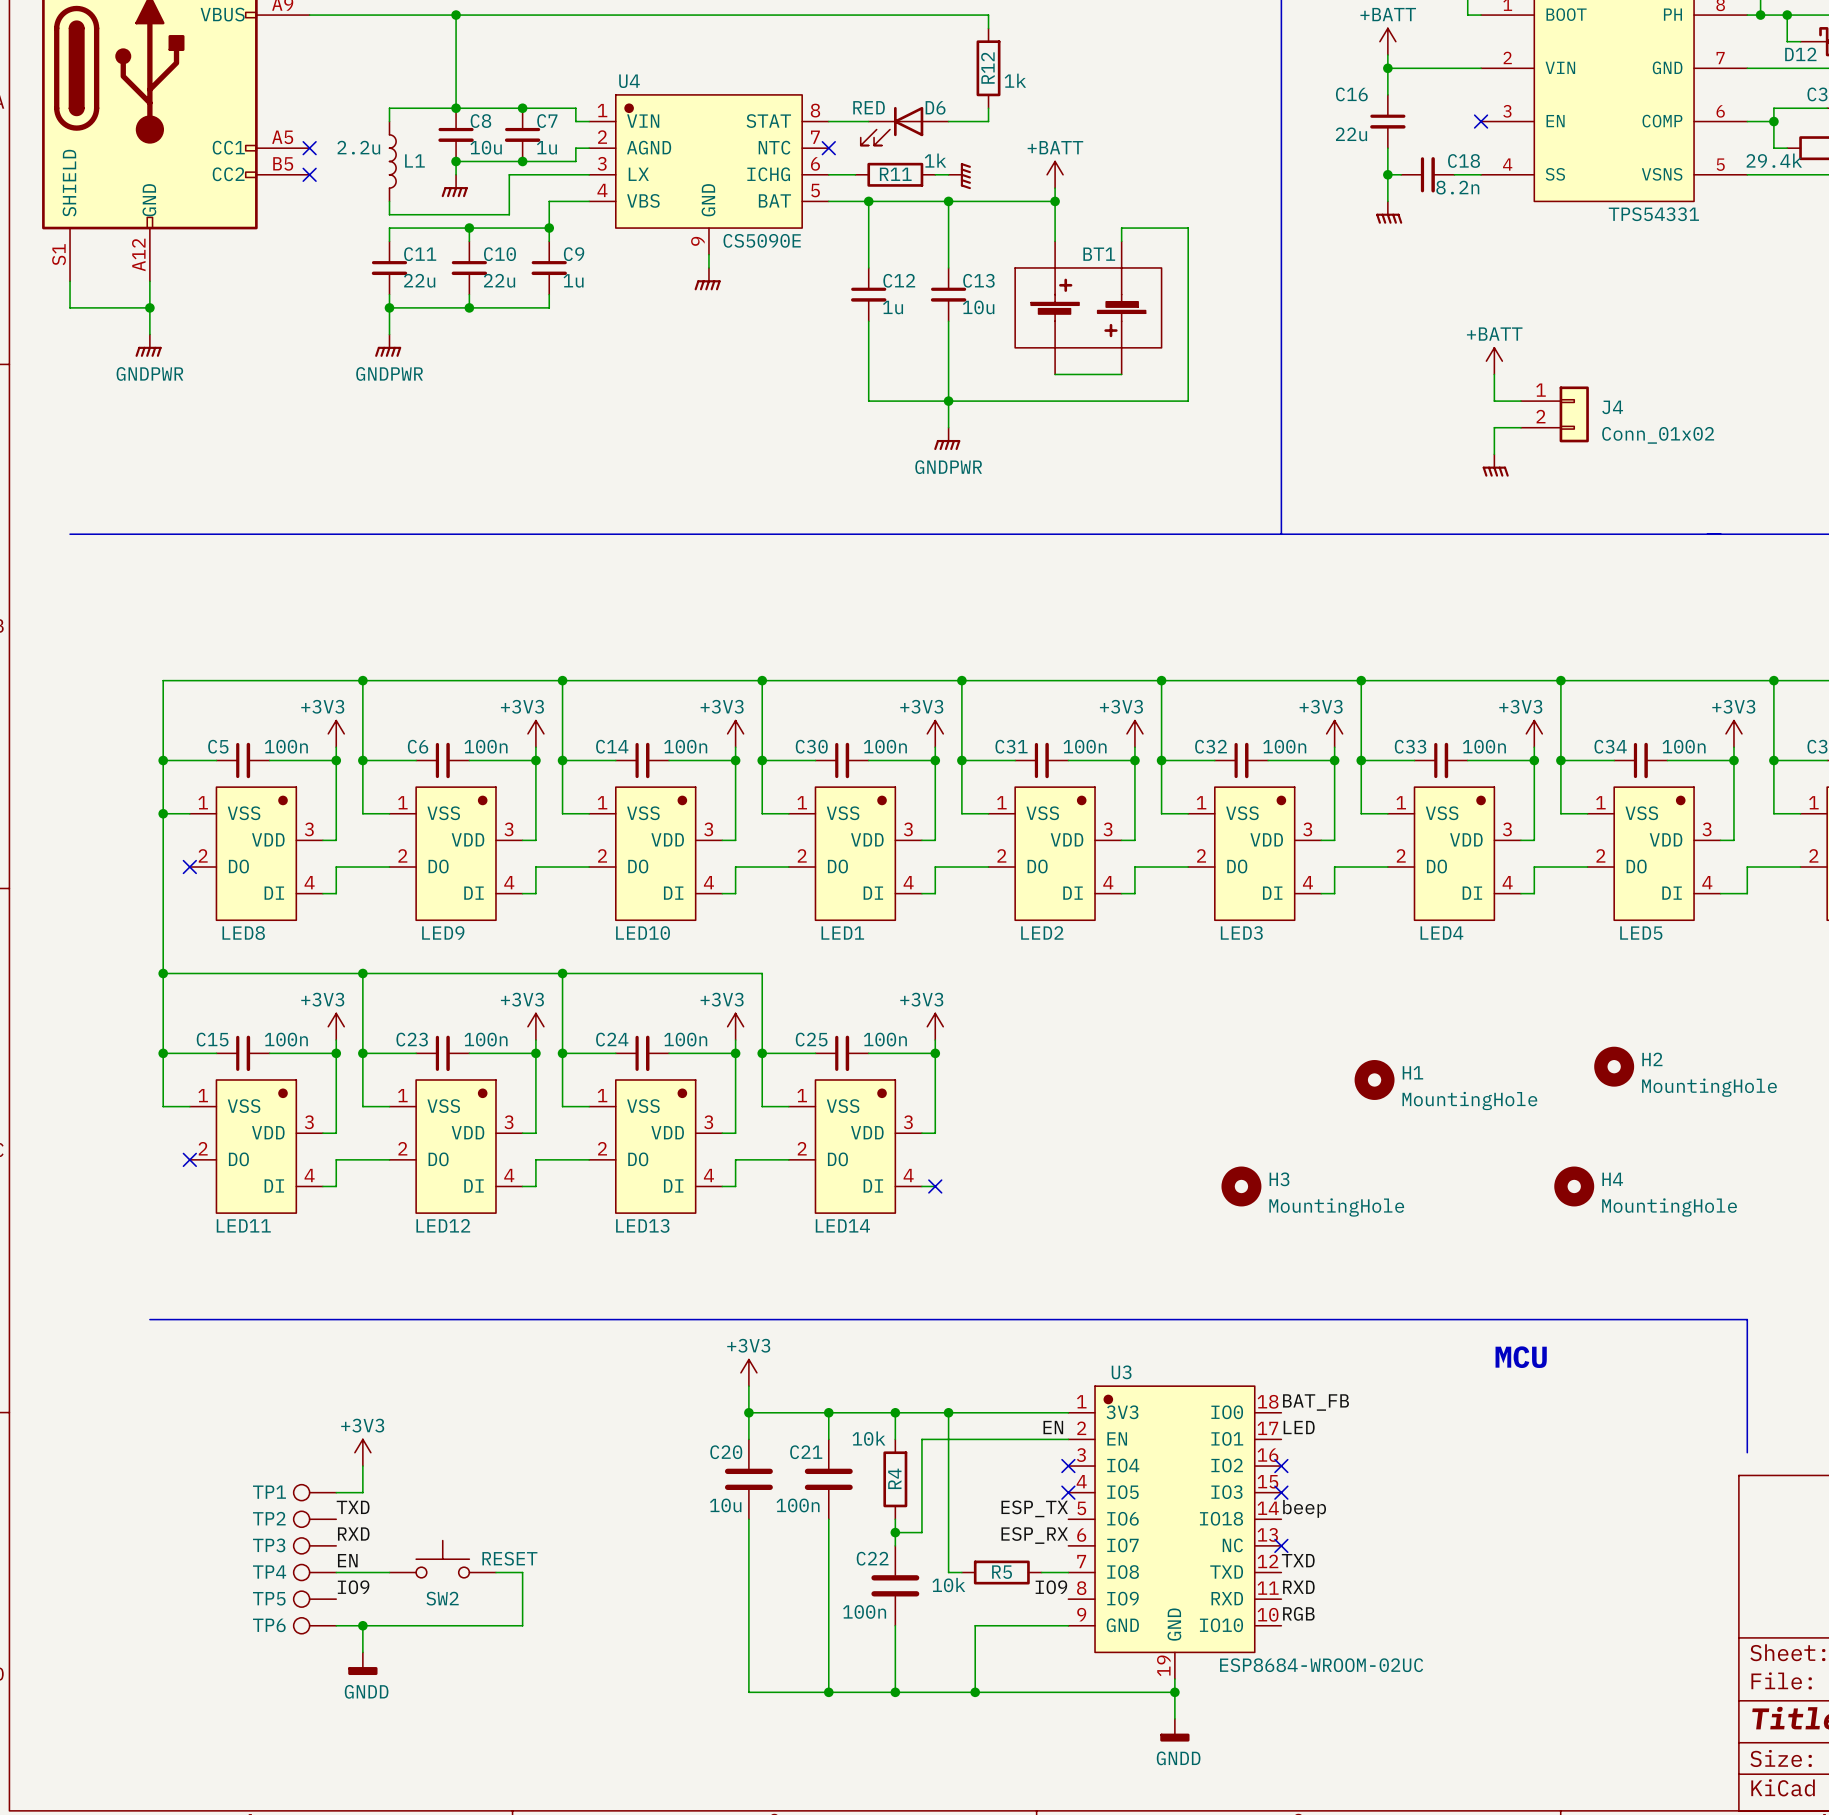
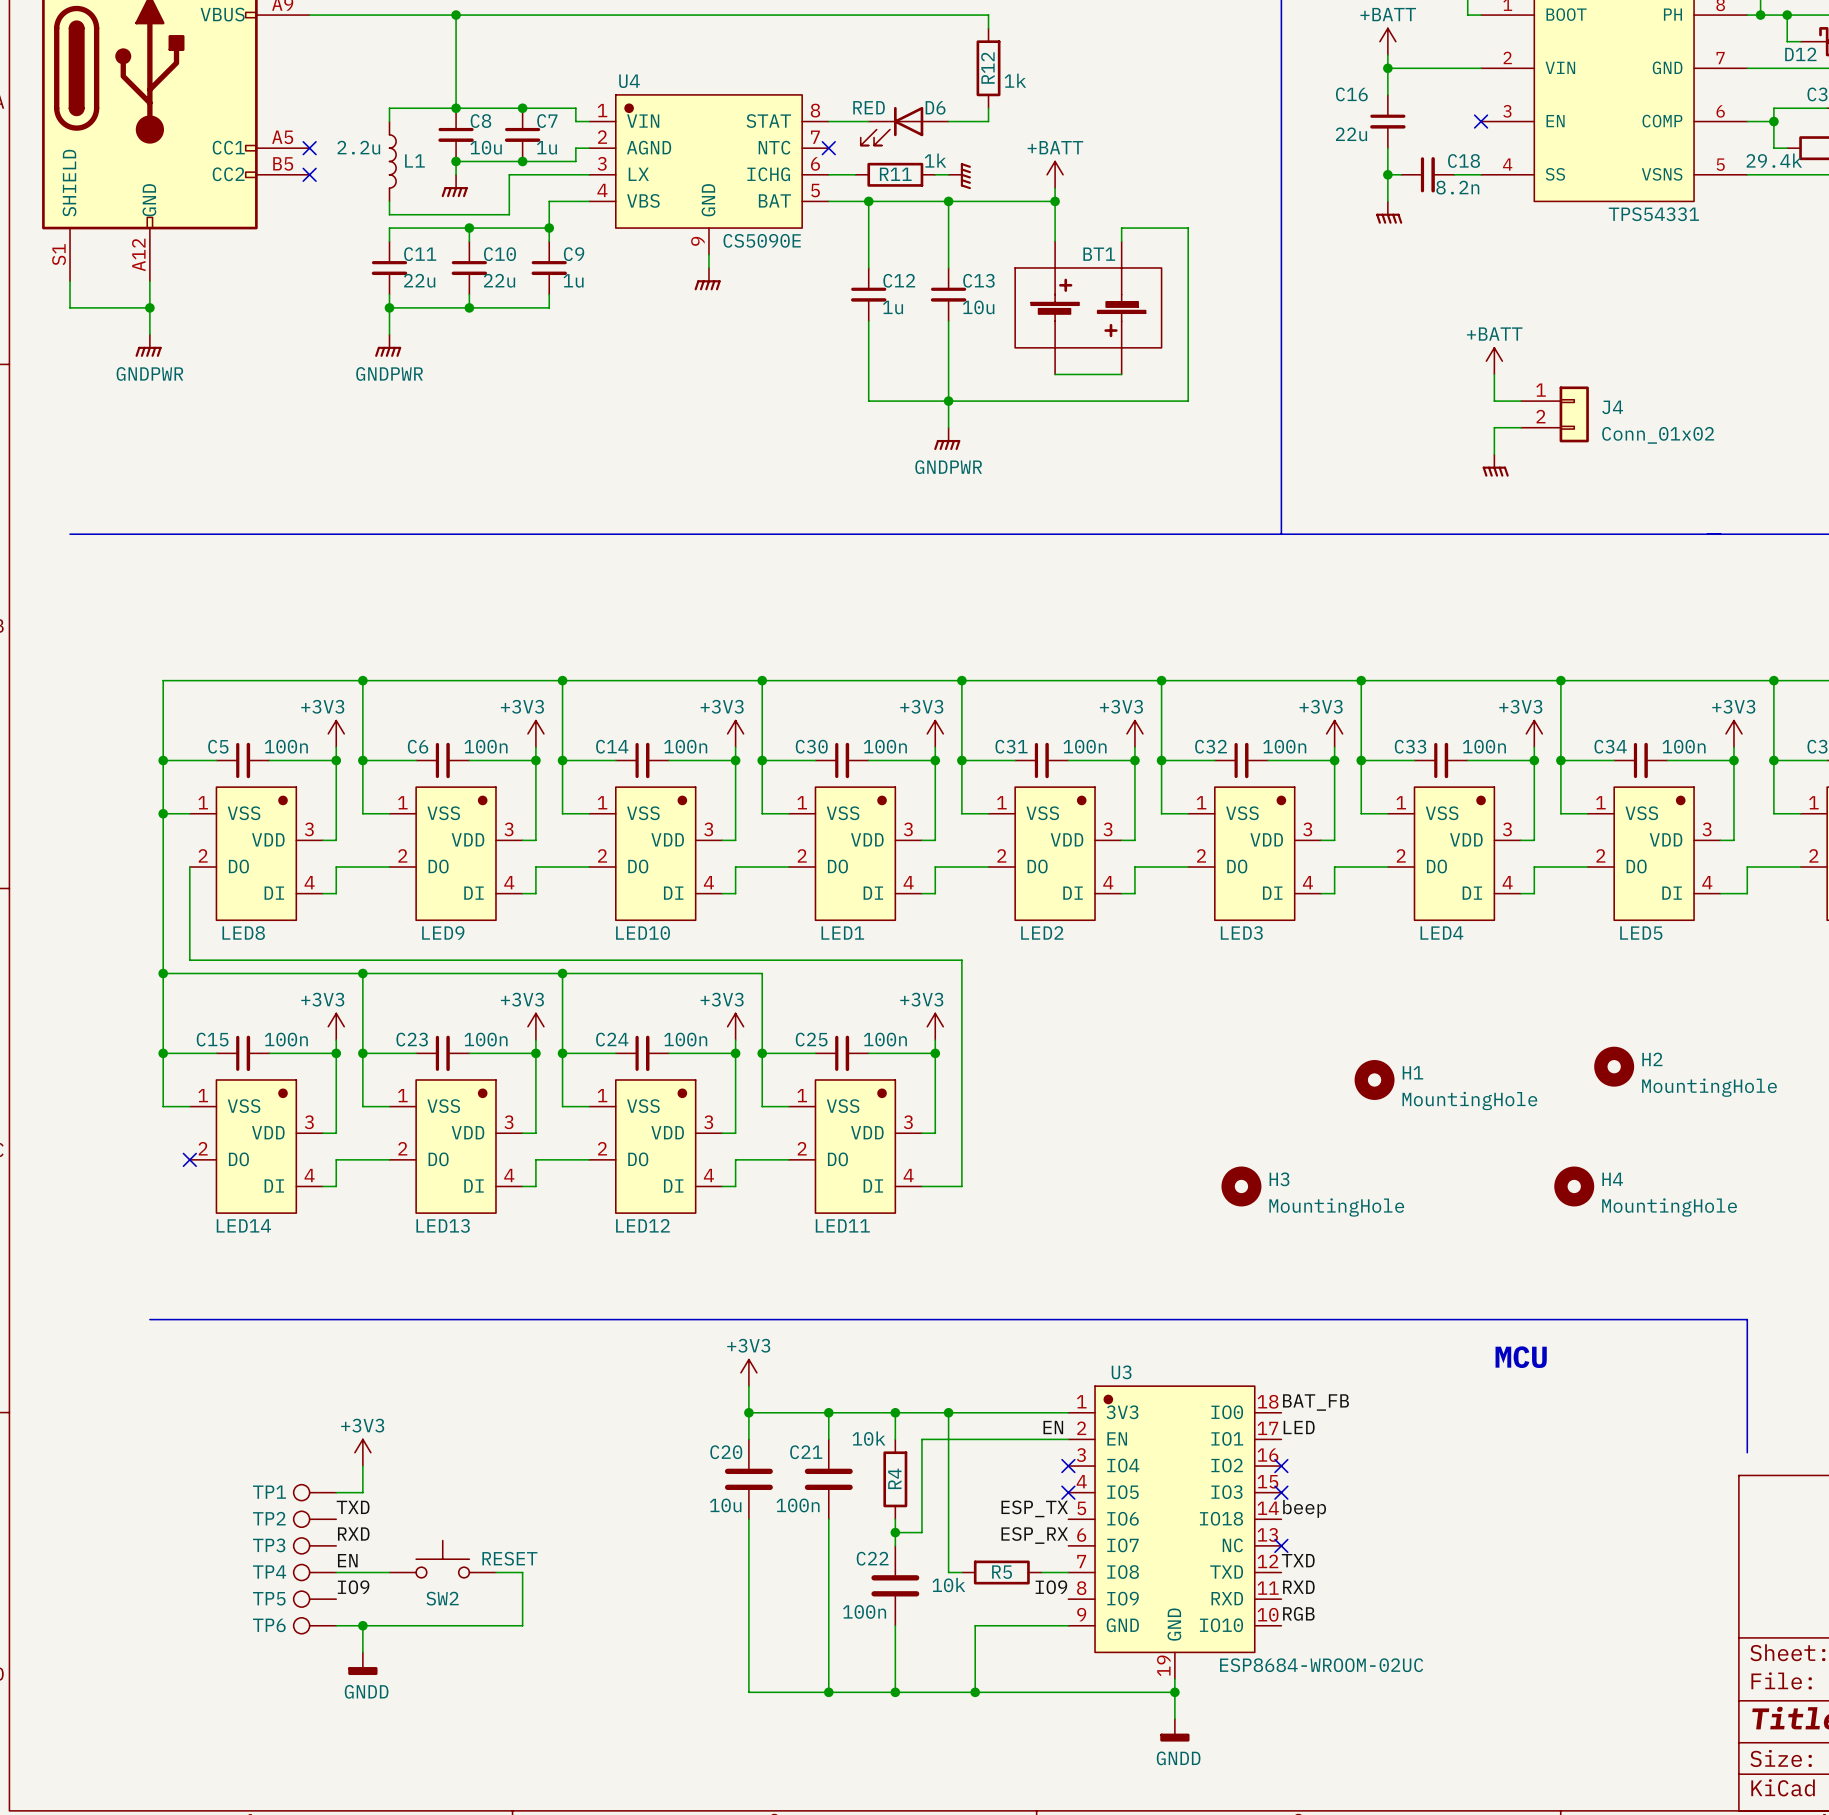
wire: none -> (189, 867) (189, 960) (961, 960) (961, 1186) (935, 1186)
no-connect mark: (189, 867) -> none
no-connect mark: (935, 1186) -> none
LED11 name: LED11 (243, 1225) -> LED14 (243, 1225)
LED12 name: LED12 (443, 1225) -> LED13 (443, 1225)
LED13 name: LED13 (642, 1225) -> LED12 (642, 1225)
LED14 name: LED14 (842, 1225) -> LED11 (842, 1225)

